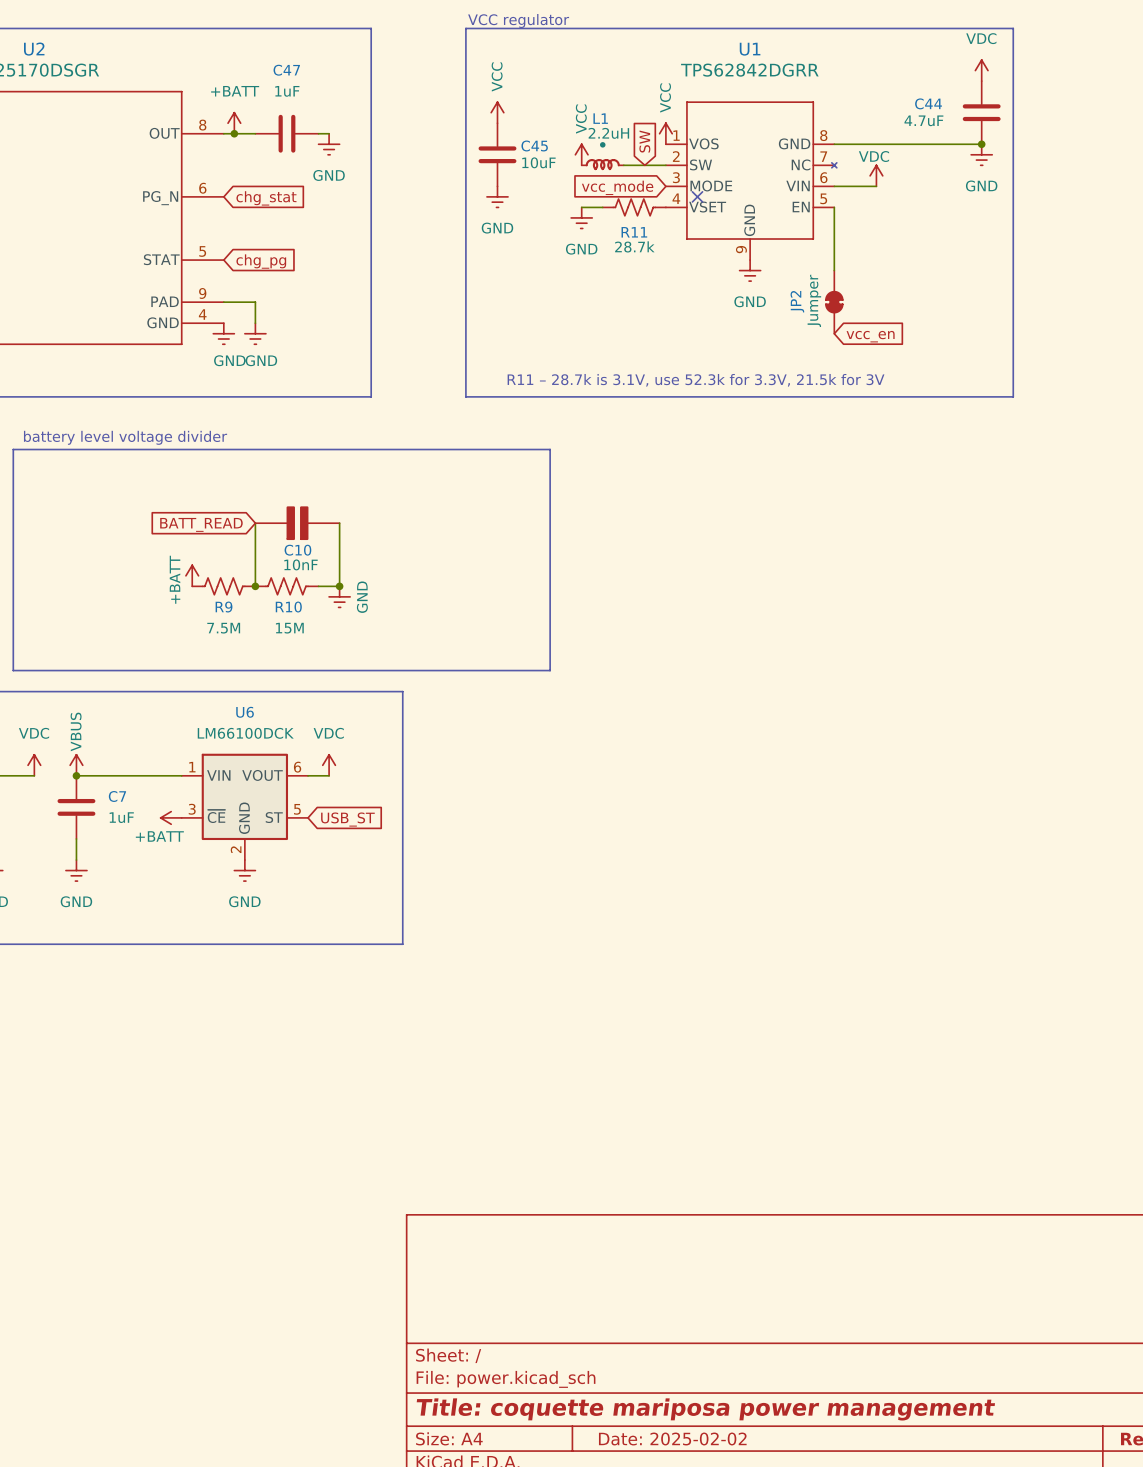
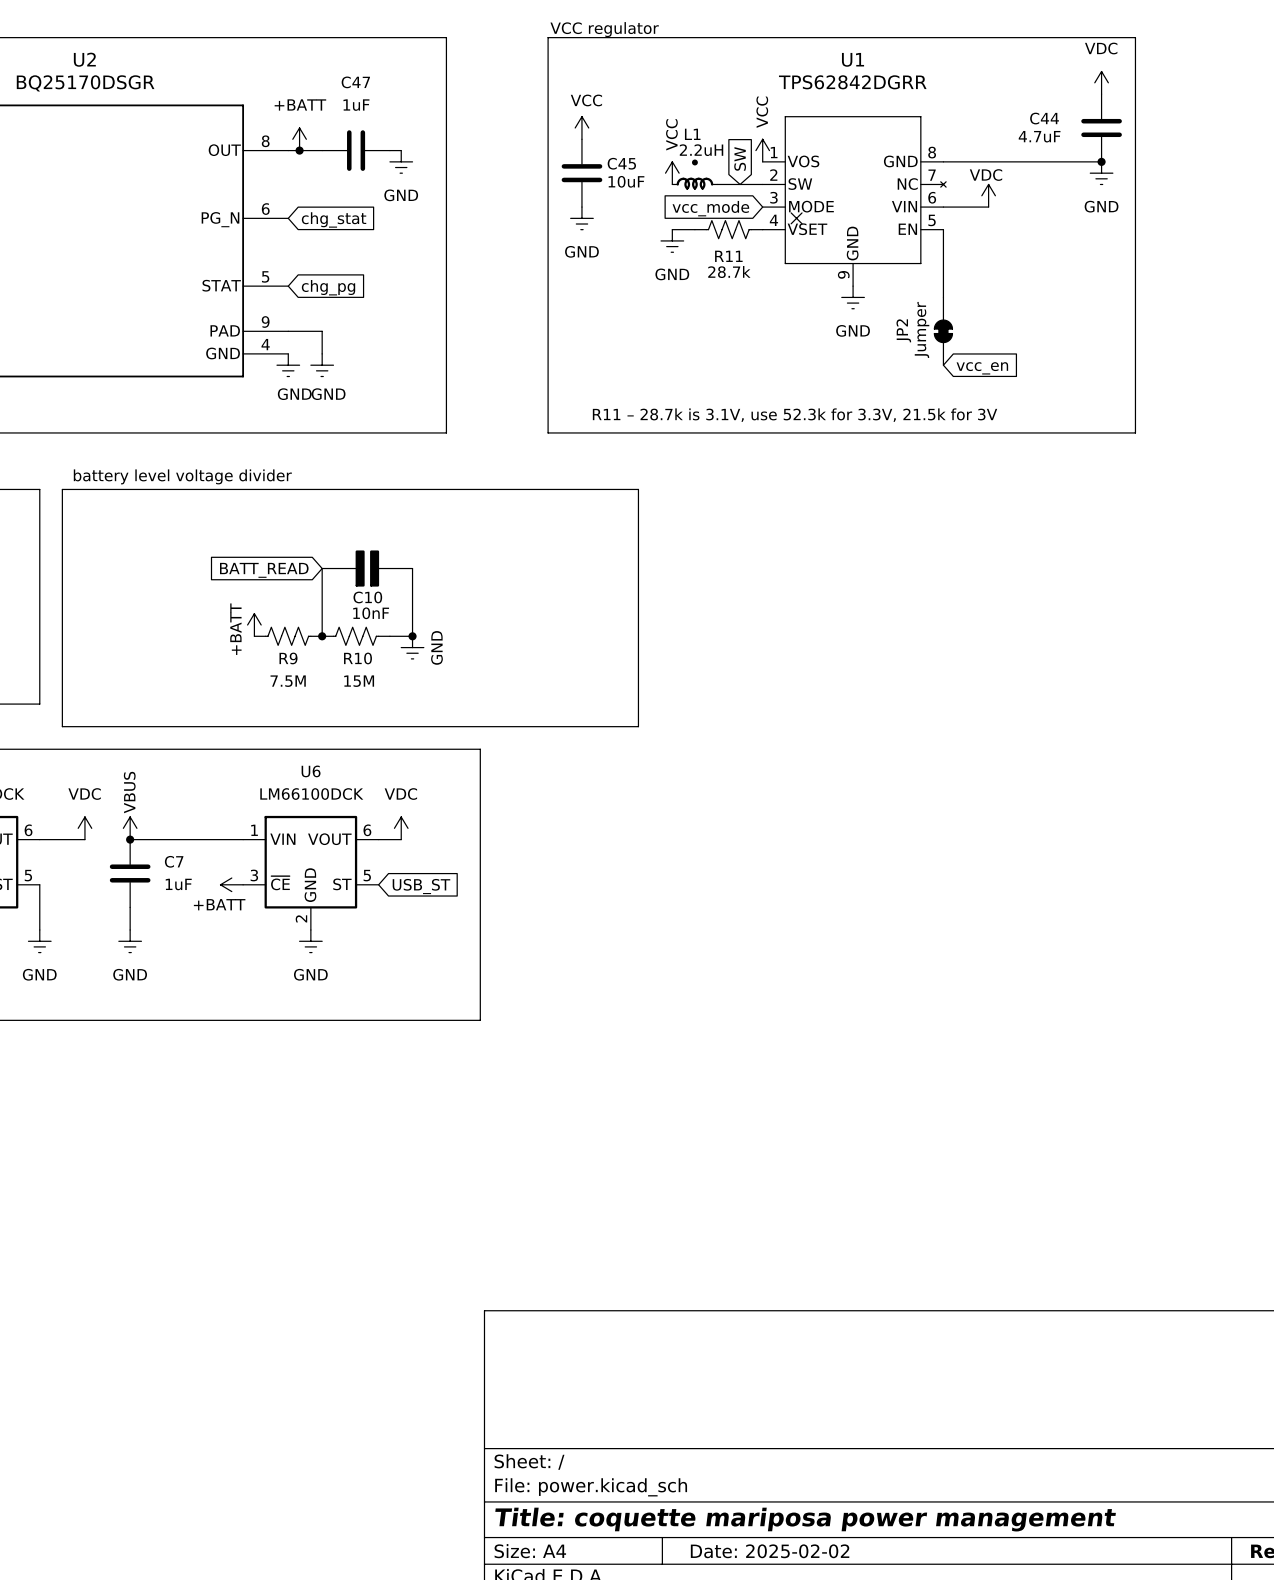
power symbol text rotation: 0° (497, 76) -> 90° clockwise (586, 100)

